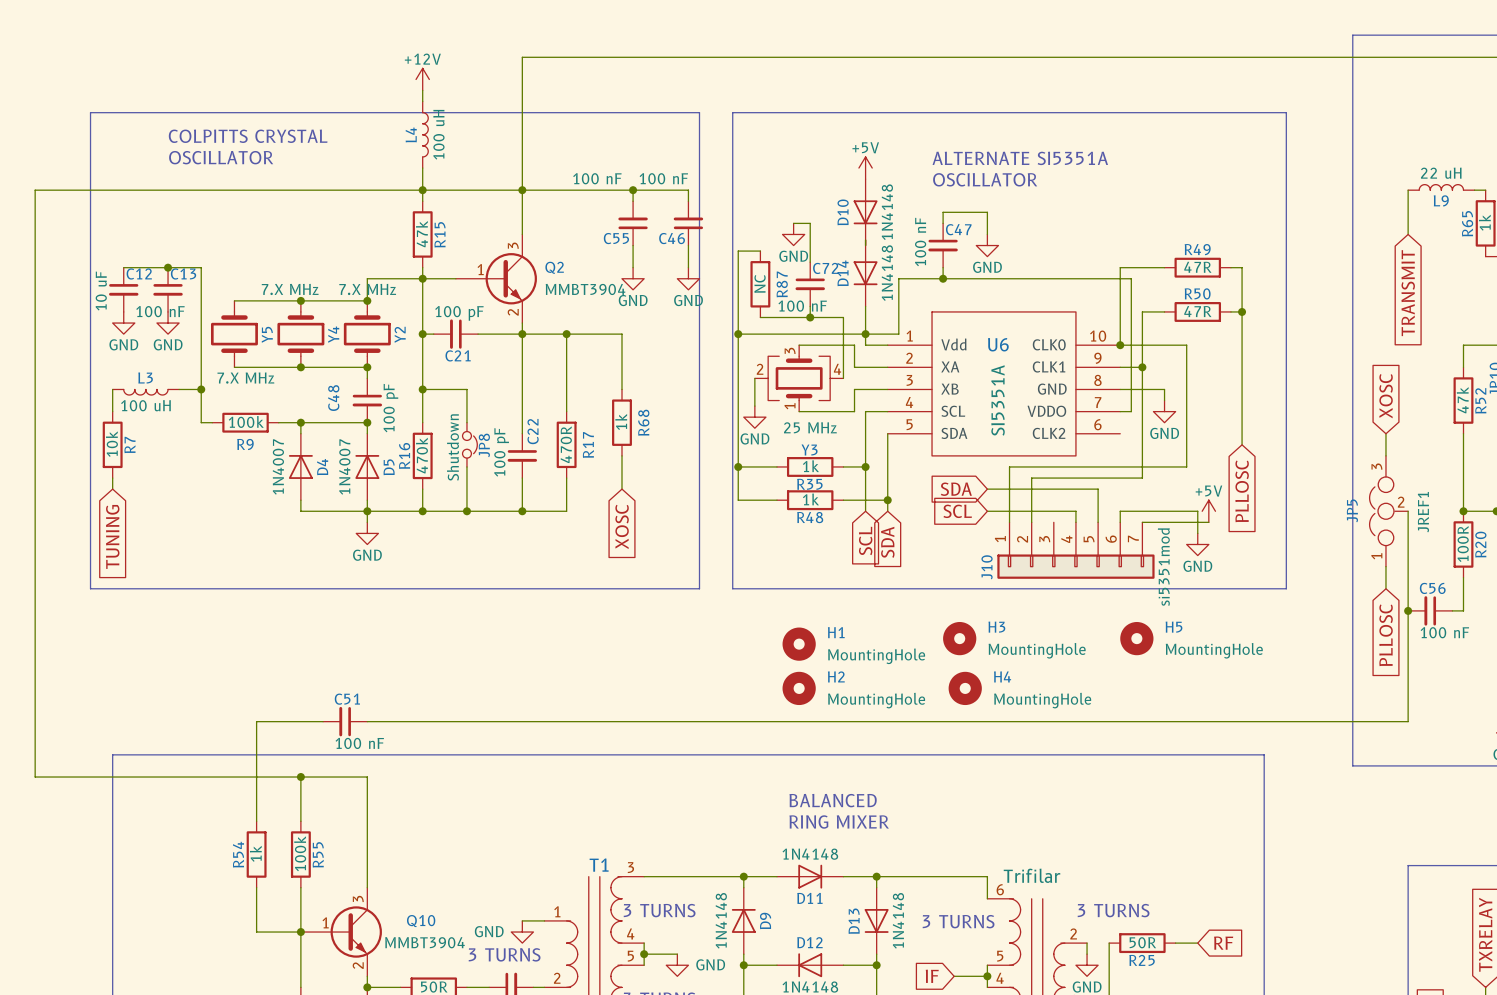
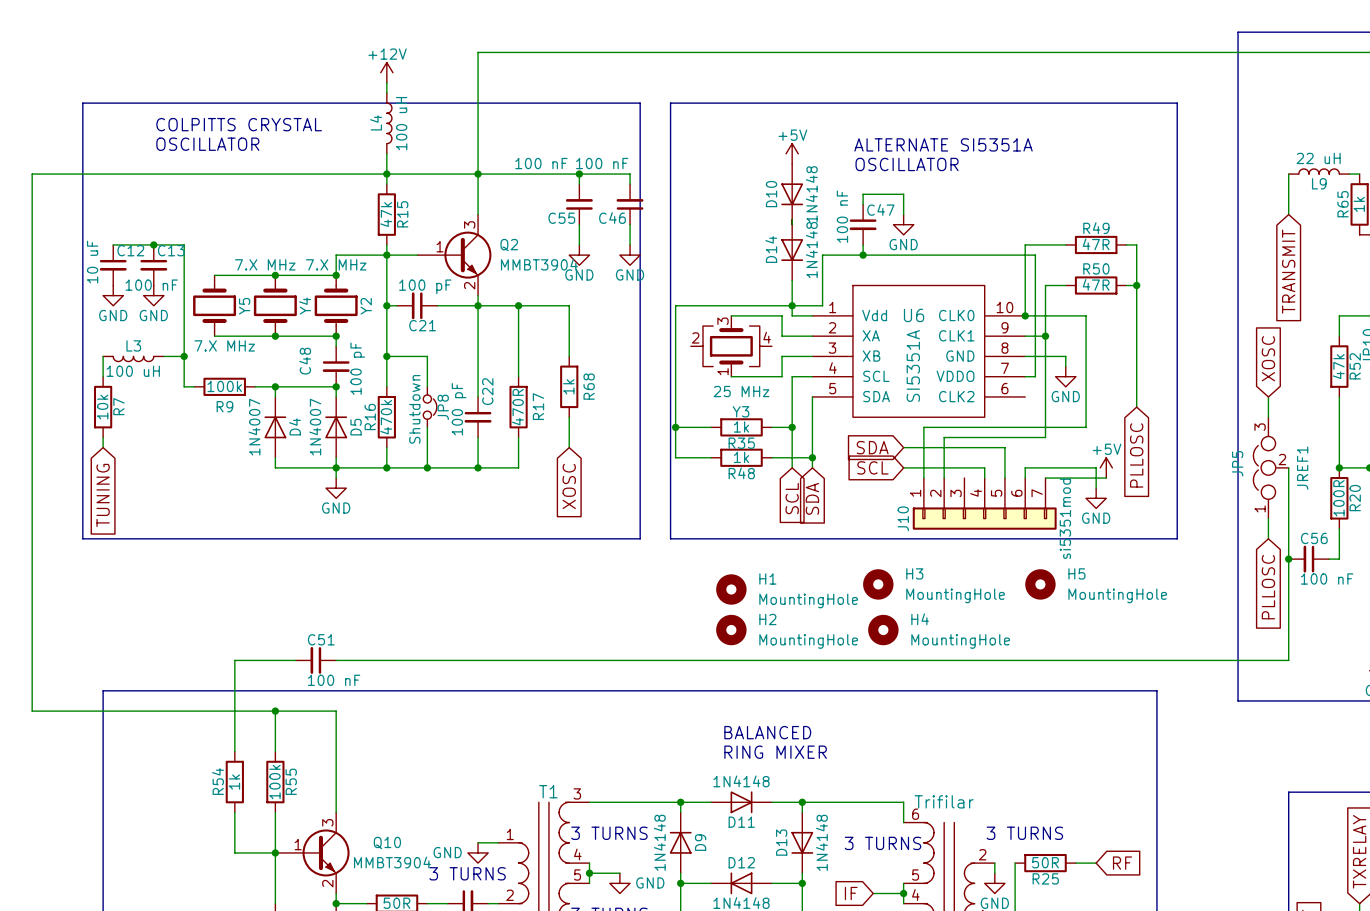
wire: (793, 223) (810, 223) (810, 262) -> none
power symbol: GND (793, 234) -> none
wire: (760, 251) (738, 251) (738, 334) -> none
R87: NC (760, 284) -> none
C72: 100 nF (810, 284) -> none
wire: (810, 306) (810, 317) -> none
wire: (760, 317) (843, 317) (843, 378) -> none
junction: (810, 317) -> none
junction: (738, 334) -> none
wire: (754, 378) (754, 406) -> none
power symbol: GND (754, 417) -> none

